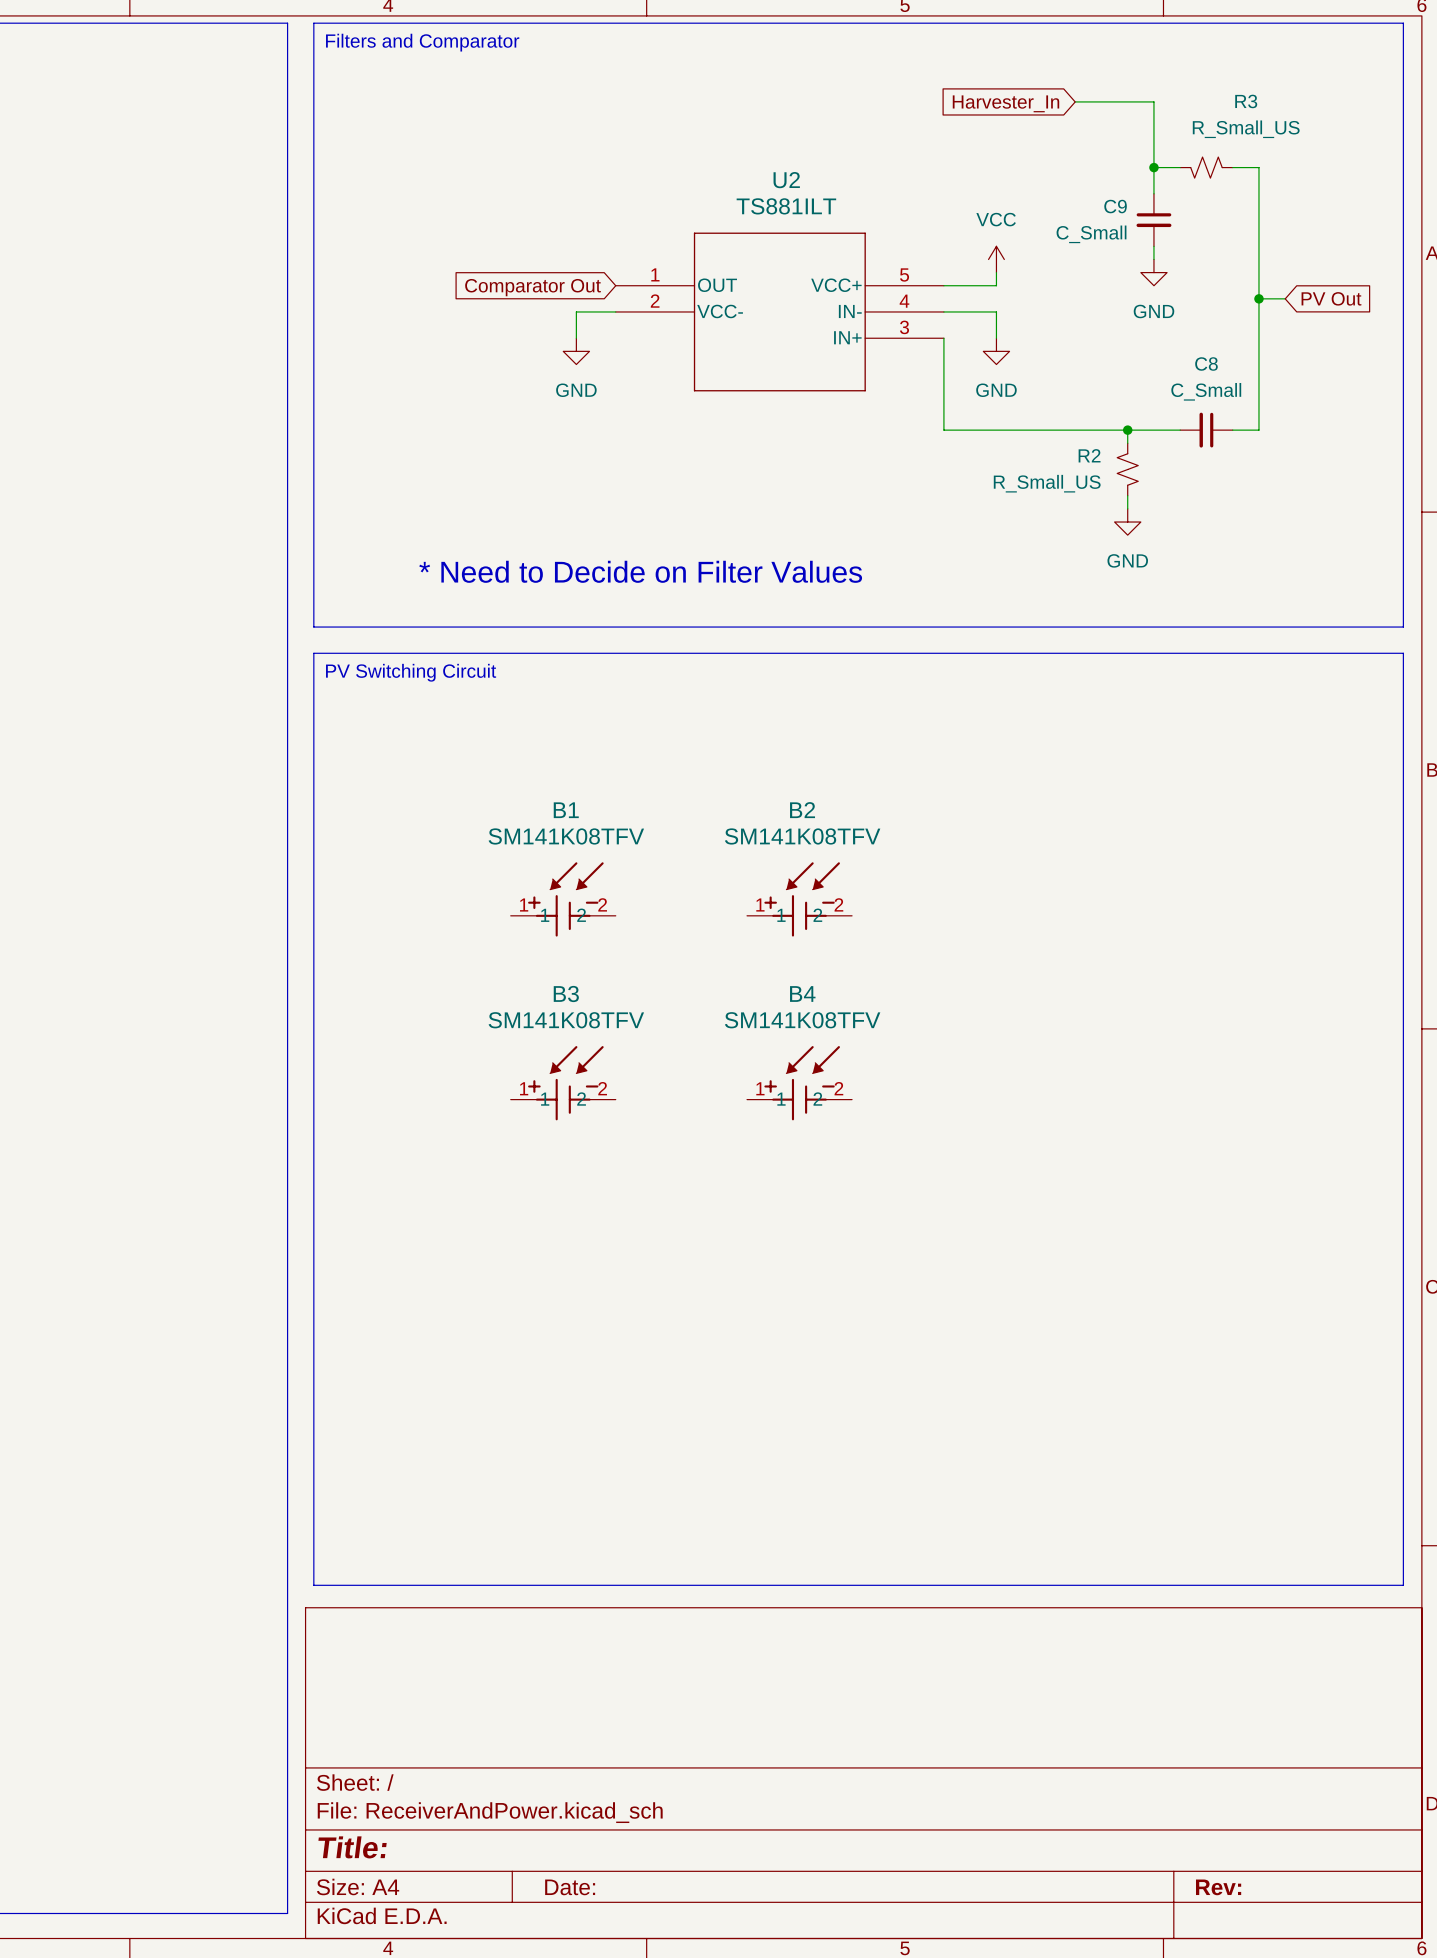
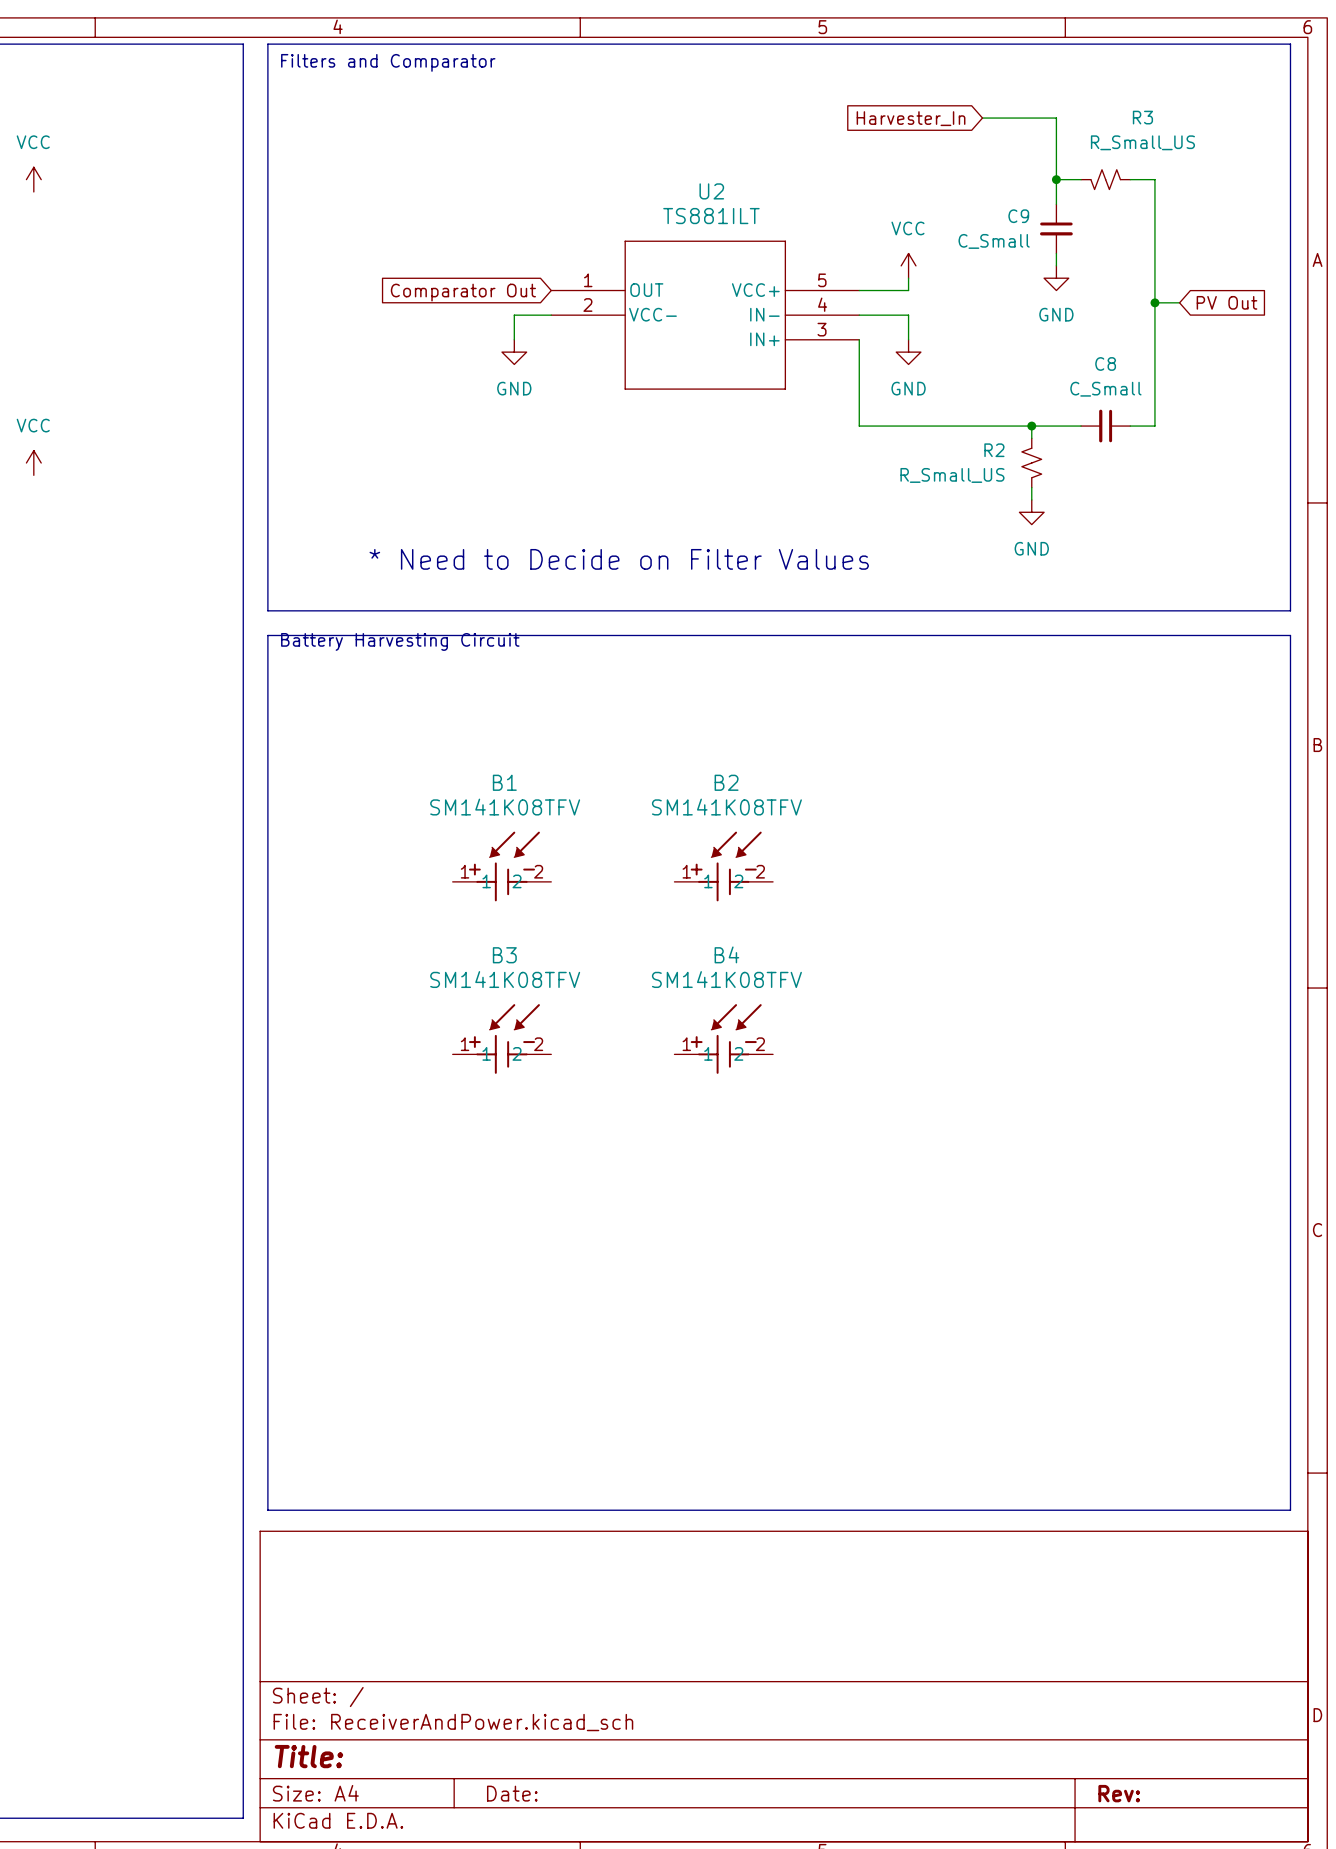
power symbol: none -> VCC (33, 179)
power symbol: none -> VCC (33, 463)
text: none -> Battery Harvesting Circuit (400, 641)
text: PV Switching Circuit (411, 672) -> none

